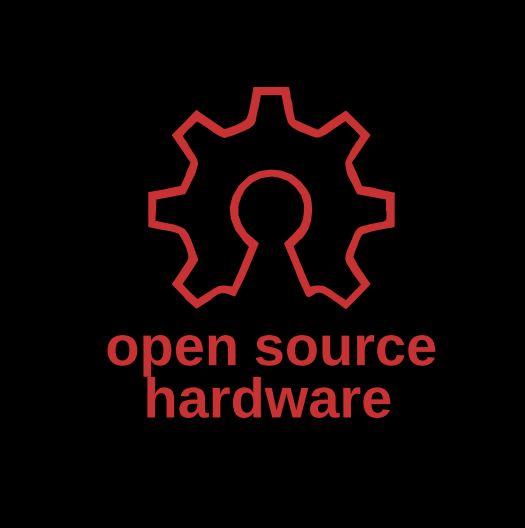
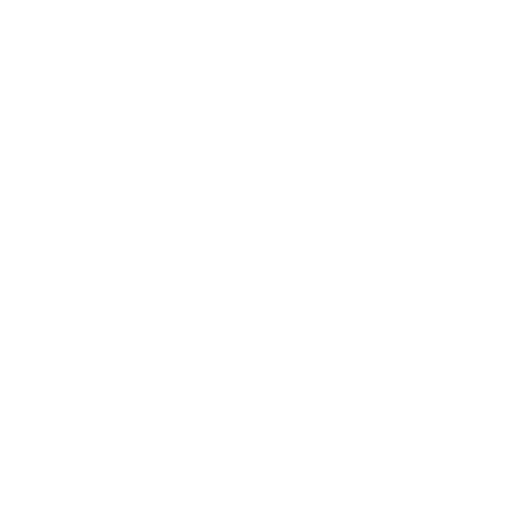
power symbol: (271, 198) -> none

